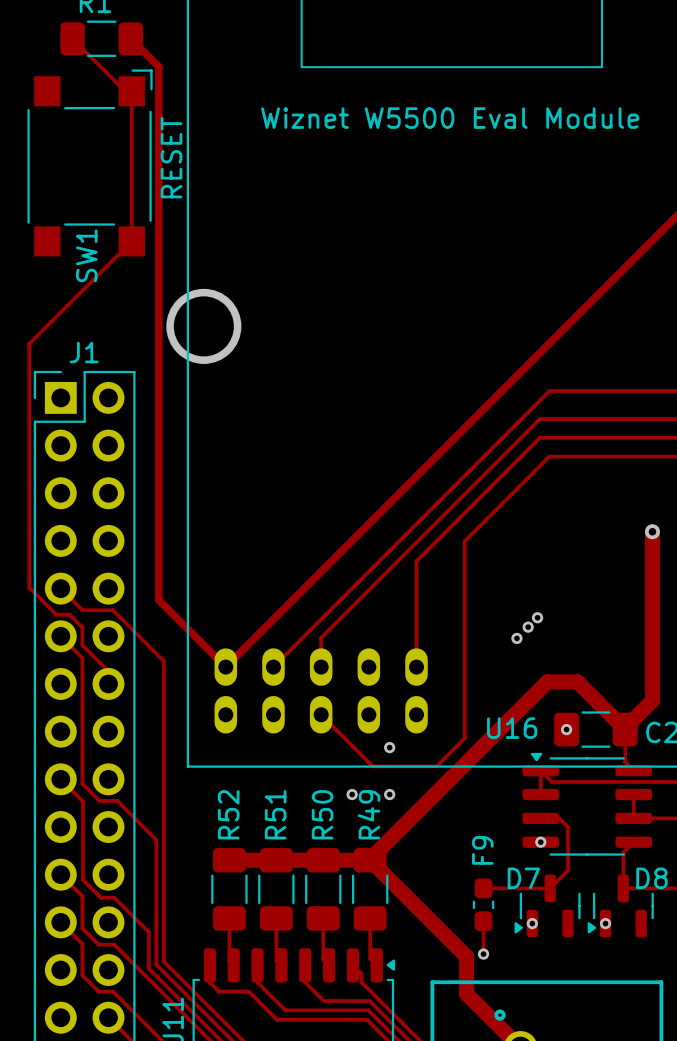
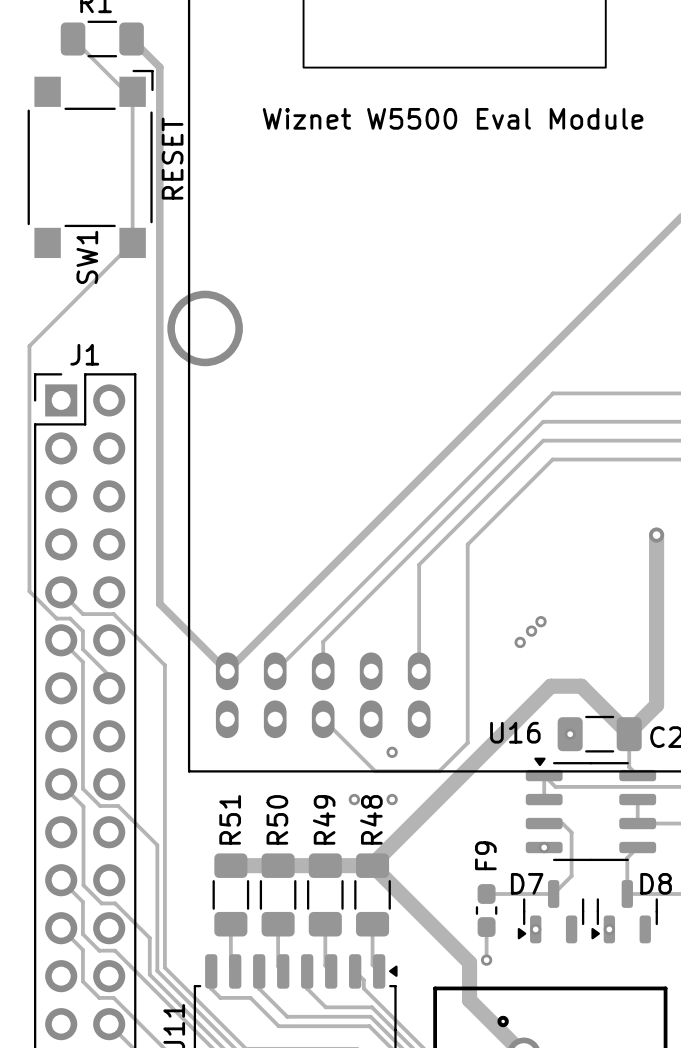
R52 name: R52 (228, 814) -> R51 (230, 819)
R51 name: R51 (275, 814) -> R50 (277, 819)
R50 name: R50 (322, 814) -> R49 (324, 819)
R49 name: R49 (369, 814) -> R48 (371, 819)

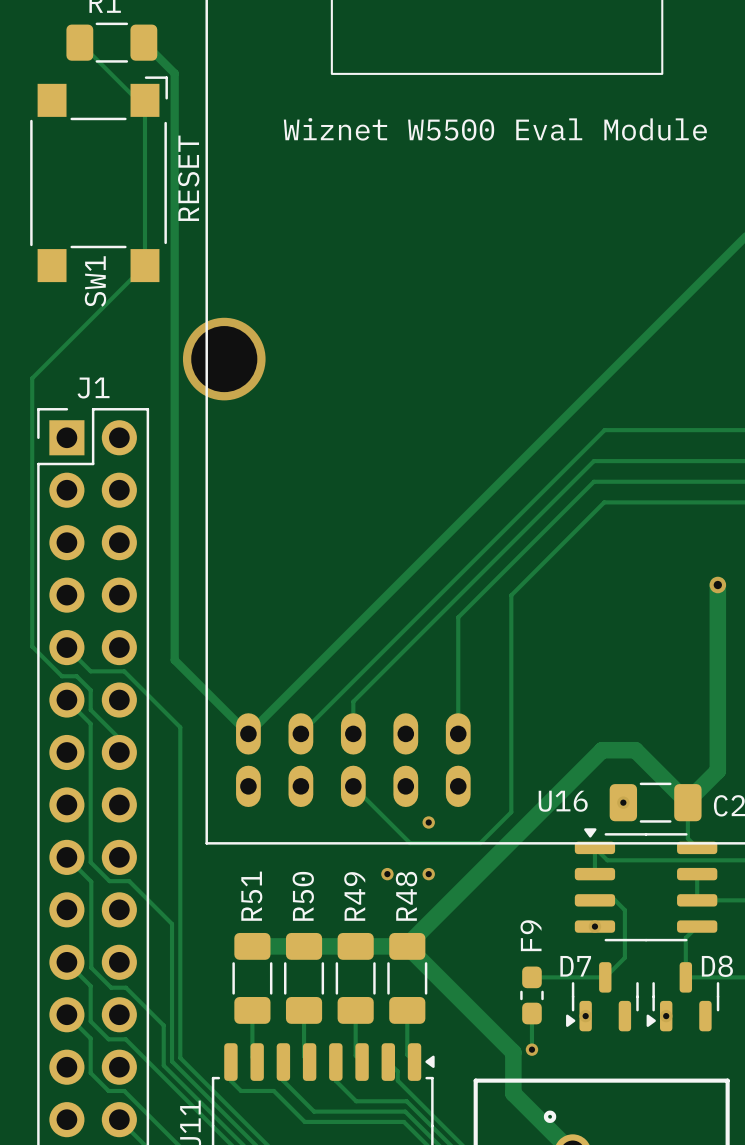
via: (540, 621) -> none
via: (531, 631) -> none
via: (520, 642) -> none

